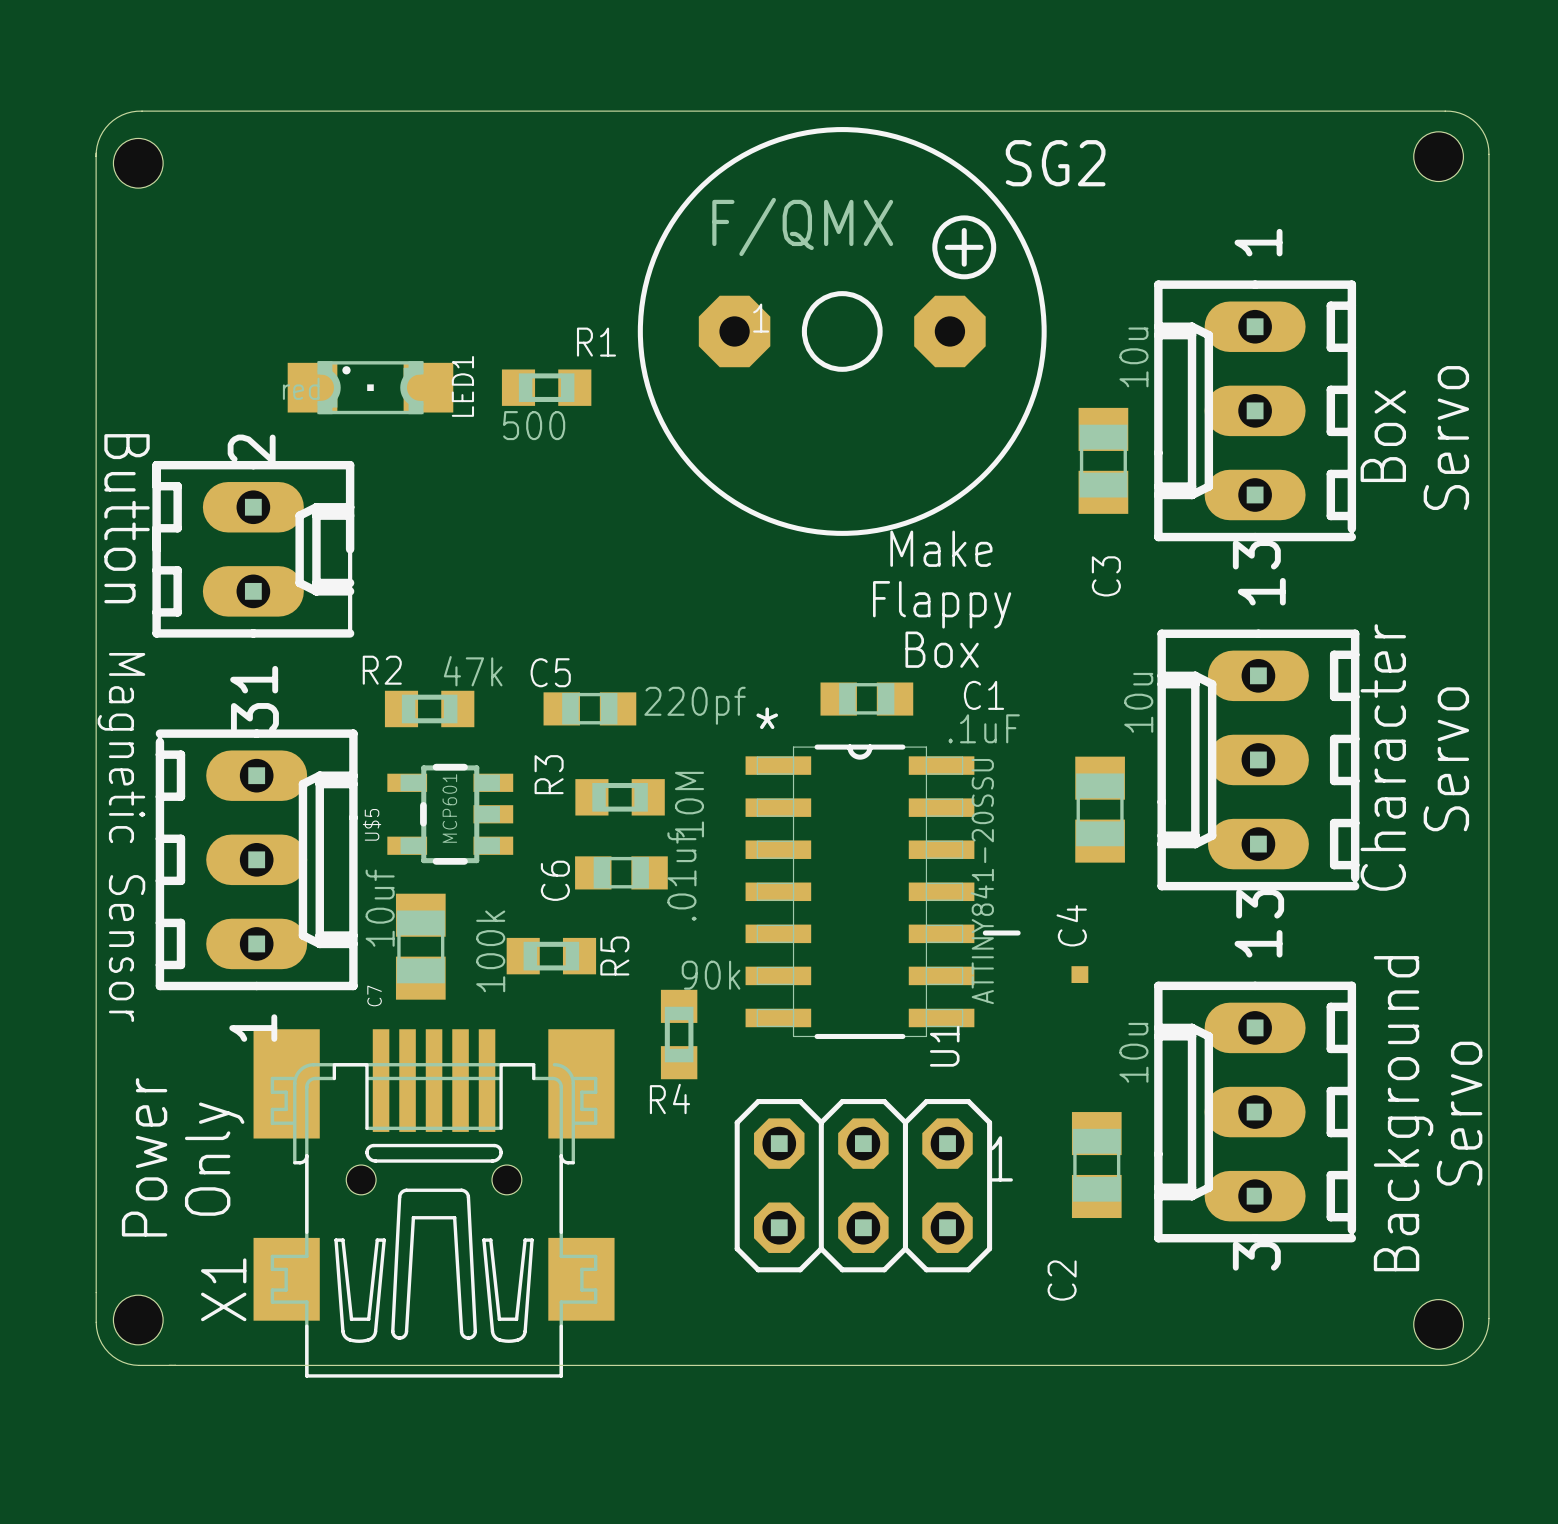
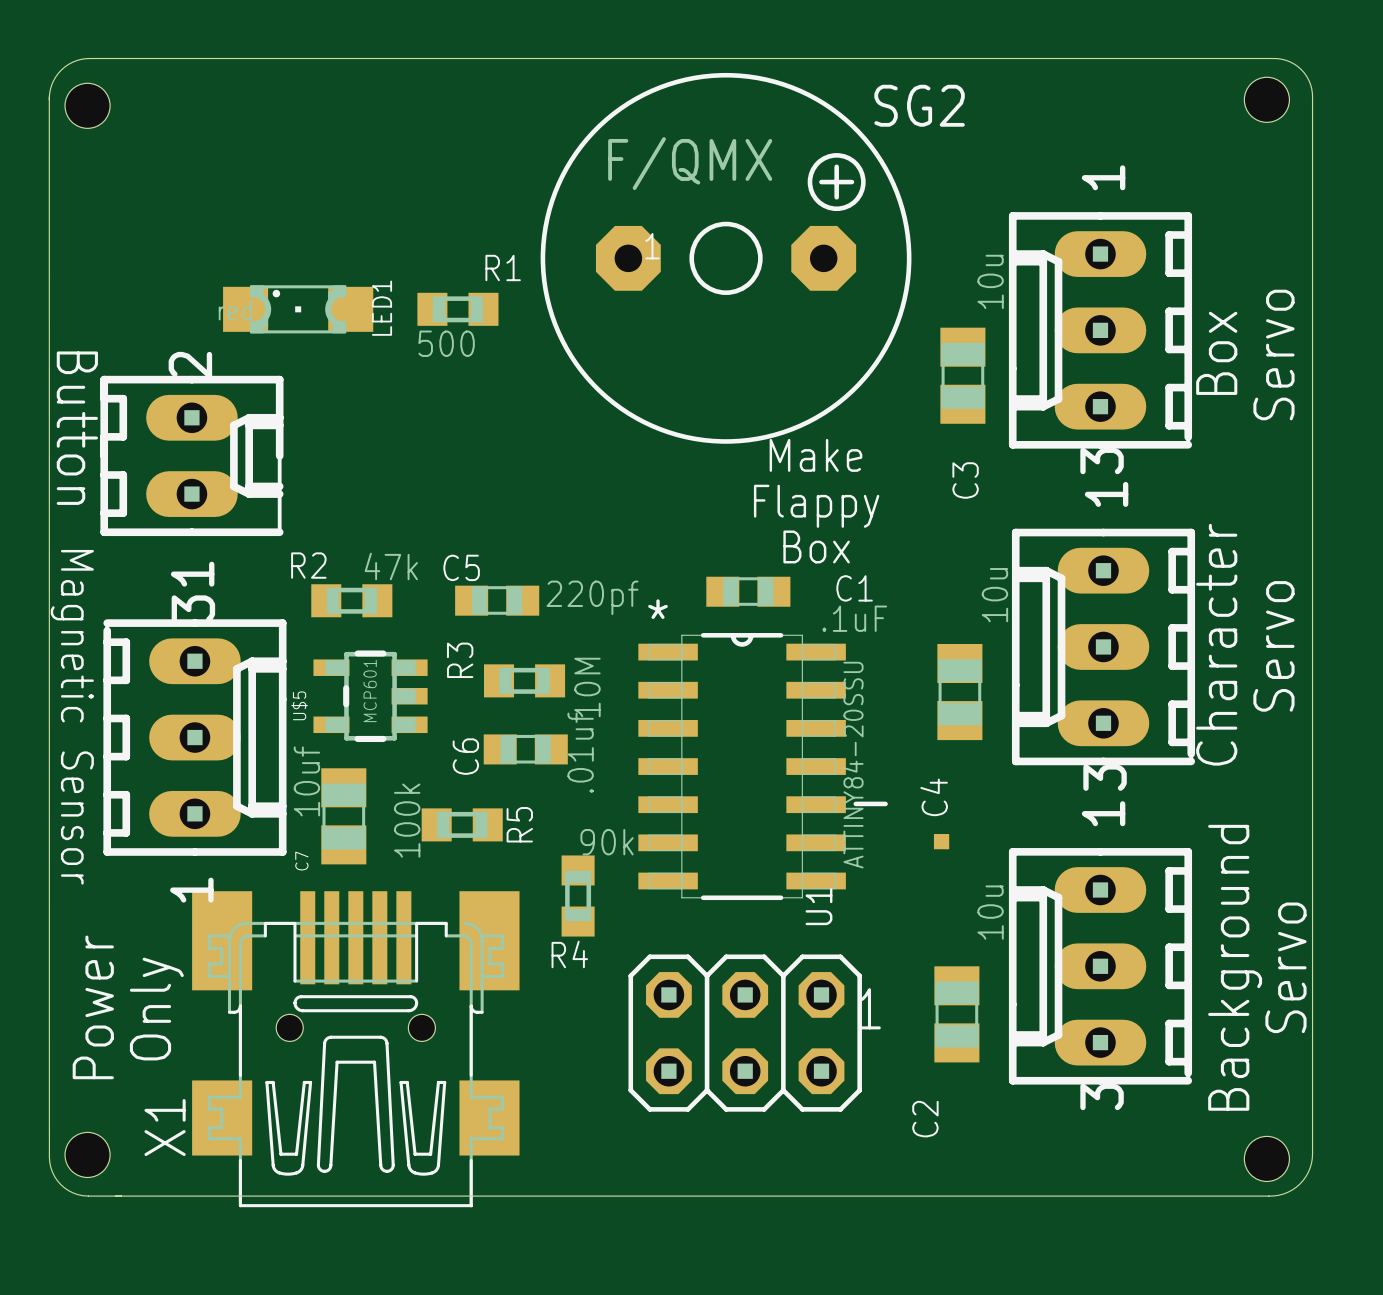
U1 value: ATTINY841-20SSU (982, 881) -> ATTINY84-20SSU (853, 765)

